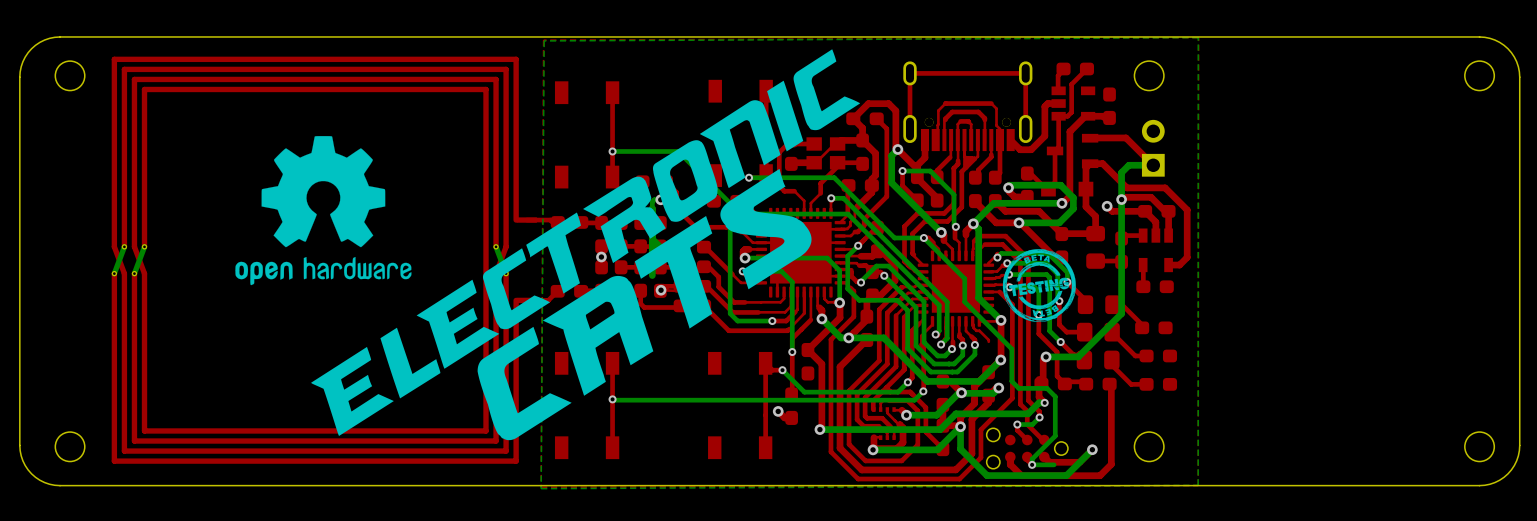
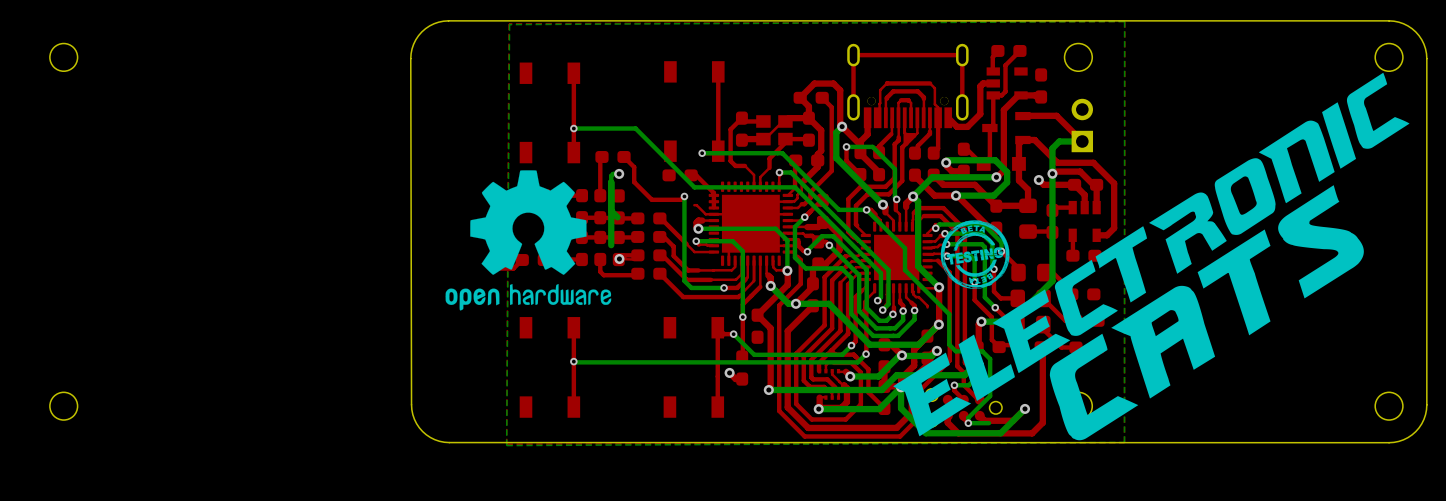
board edge: (479, 36) (60, 36) (44, 40) (31, 48) (22, 61) (19, 77) (19, 445) (22, 460) (31, 473) (44, 482) (60, 485) (1479, 485) -> (448, 20) (434, 23) (421, 31) (413, 44) (410, 58) (411, 404) (414, 419) (419, 427) (434, 439) (449, 442) (1389, 442)
drawing: [311, 49, 861, 441] -> none
drawing: none -> [893, 72, 1410, 441]
drawing position: (323, 210) -> (528, 240)
part: (324, 260) -> none

